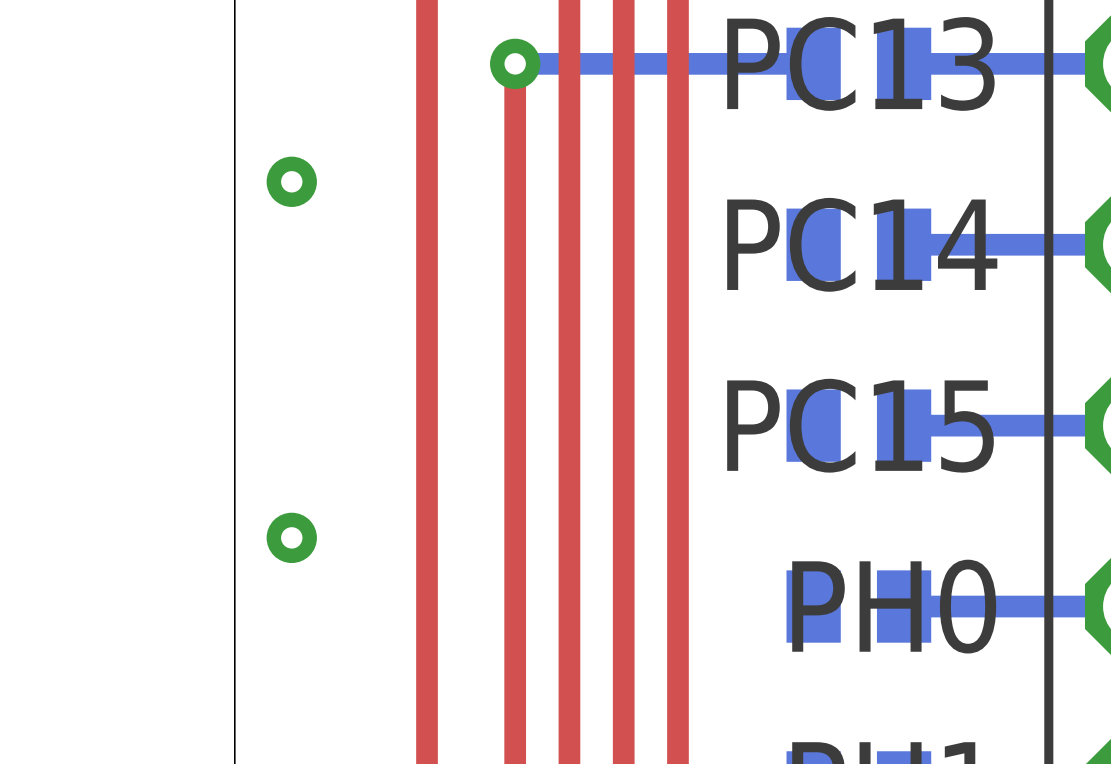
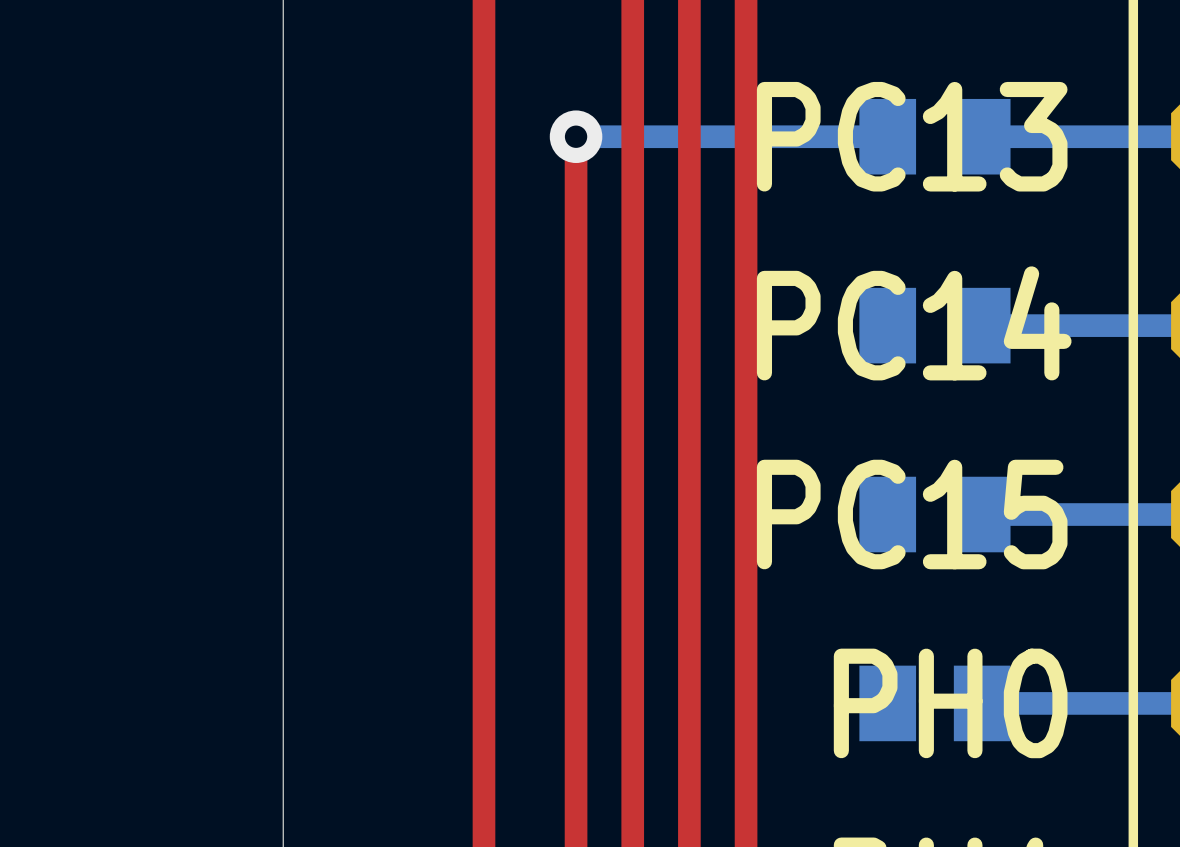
via: (291, 181) -> none
via: (291, 537) -> none

